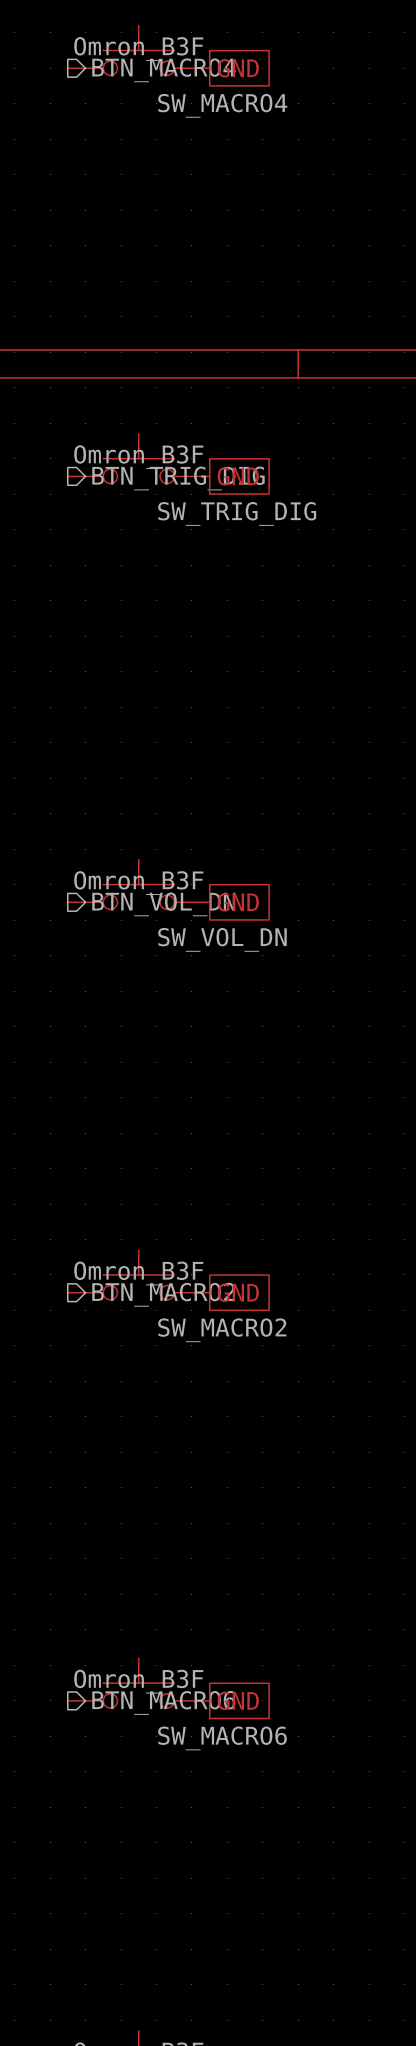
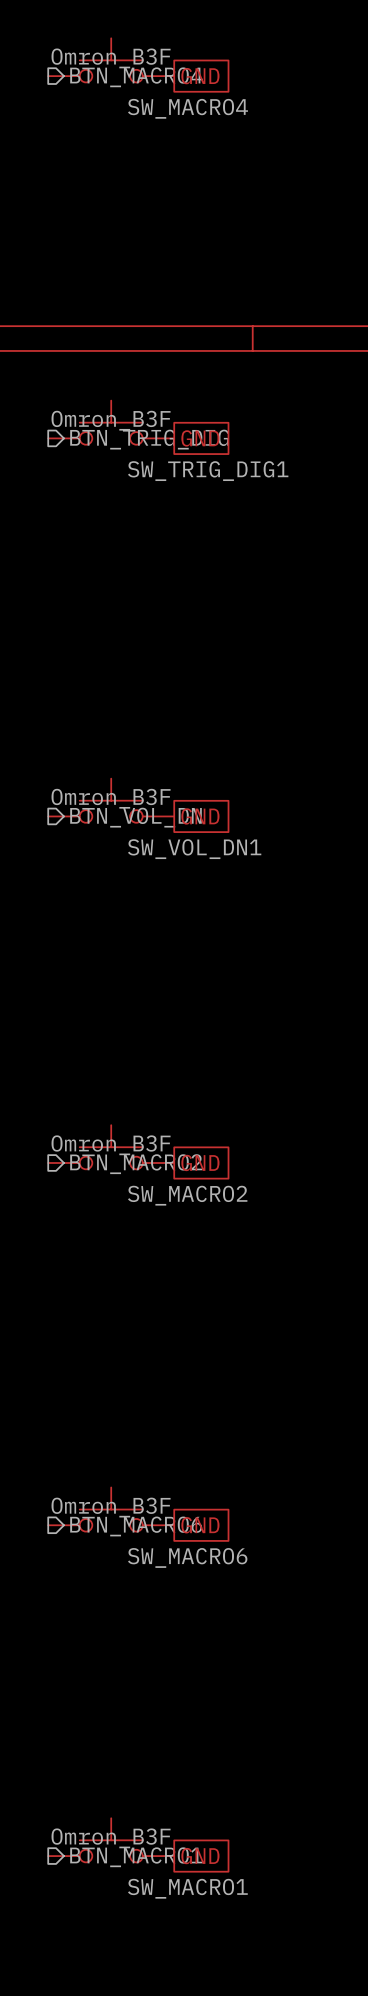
SW_TRIG_DIG name: SW_TRIG_DIG (237, 513) -> SW_TRIG_DIG1 (208, 471)
SW_VOL_DN name: SW_VOL_DN (222, 939) -> SW_VOL_DN1 (194, 849)

